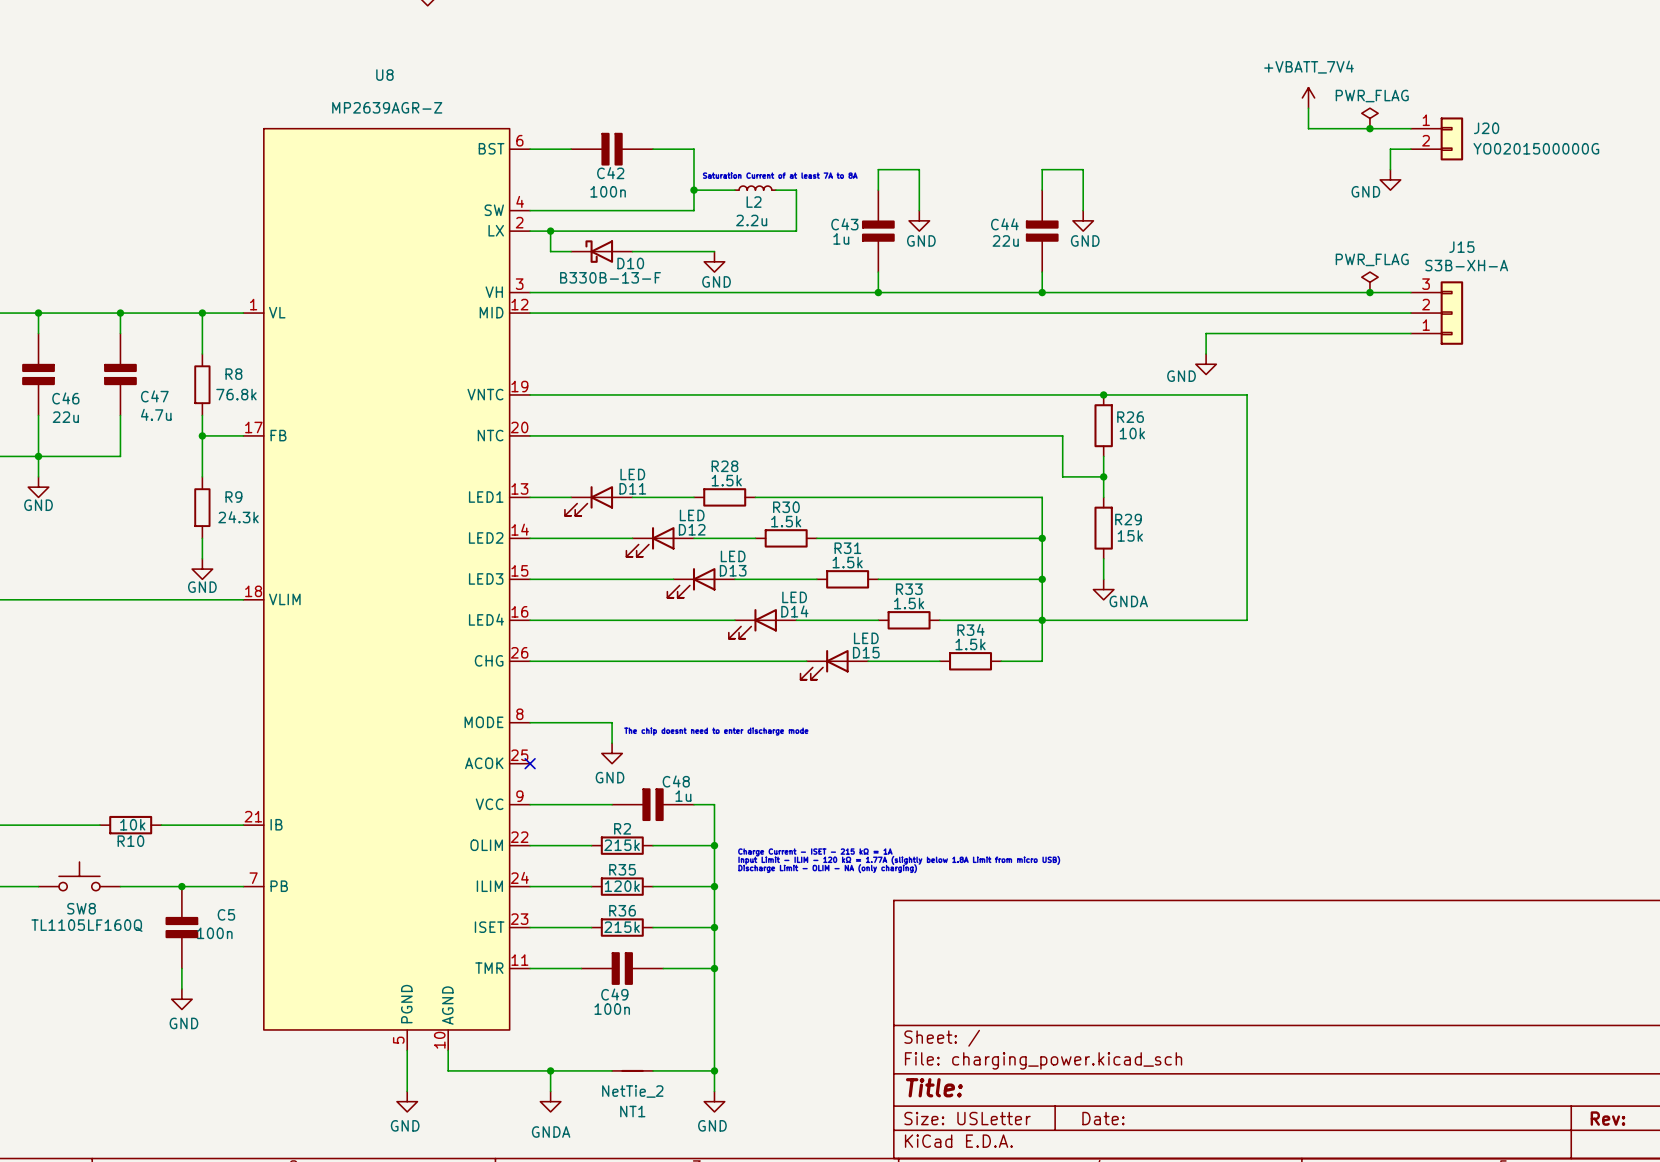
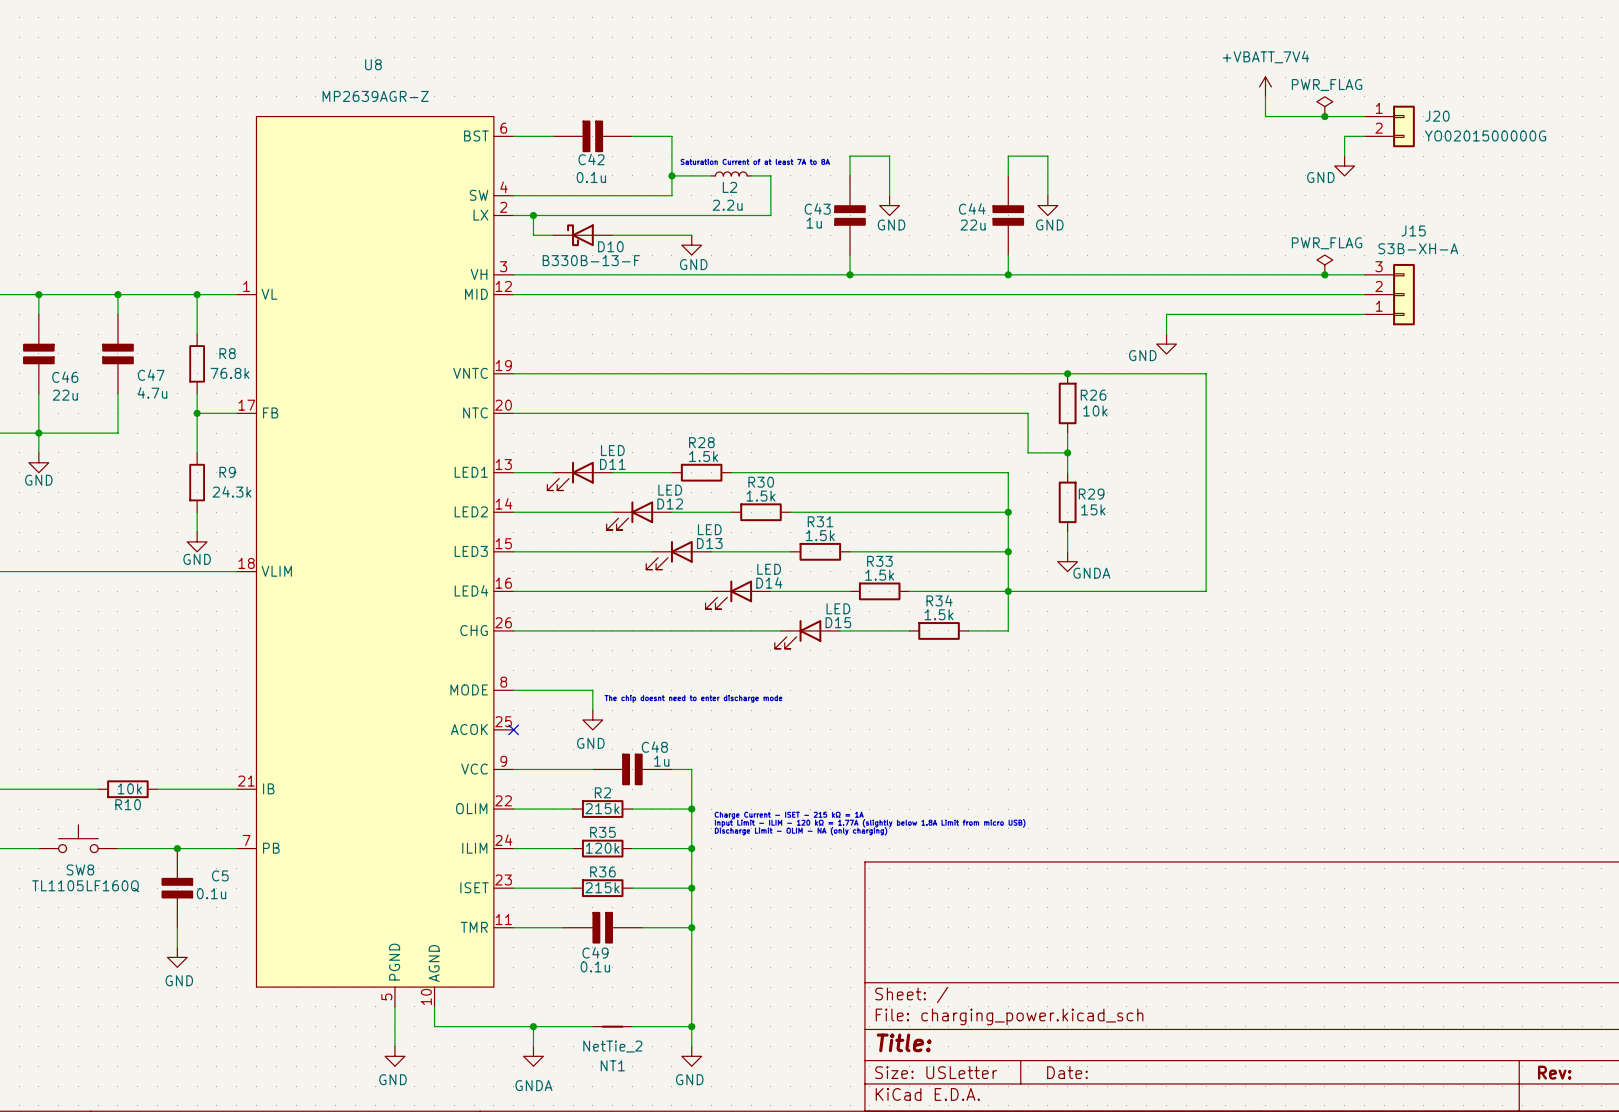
C42 value: 100n (608, 191) -> 0.1u (591, 177)
C5 value: 100n (214, 933) -> 0.1u (211, 893)
C49 value: 100n (612, 1009) -> 0.1u (595, 966)

